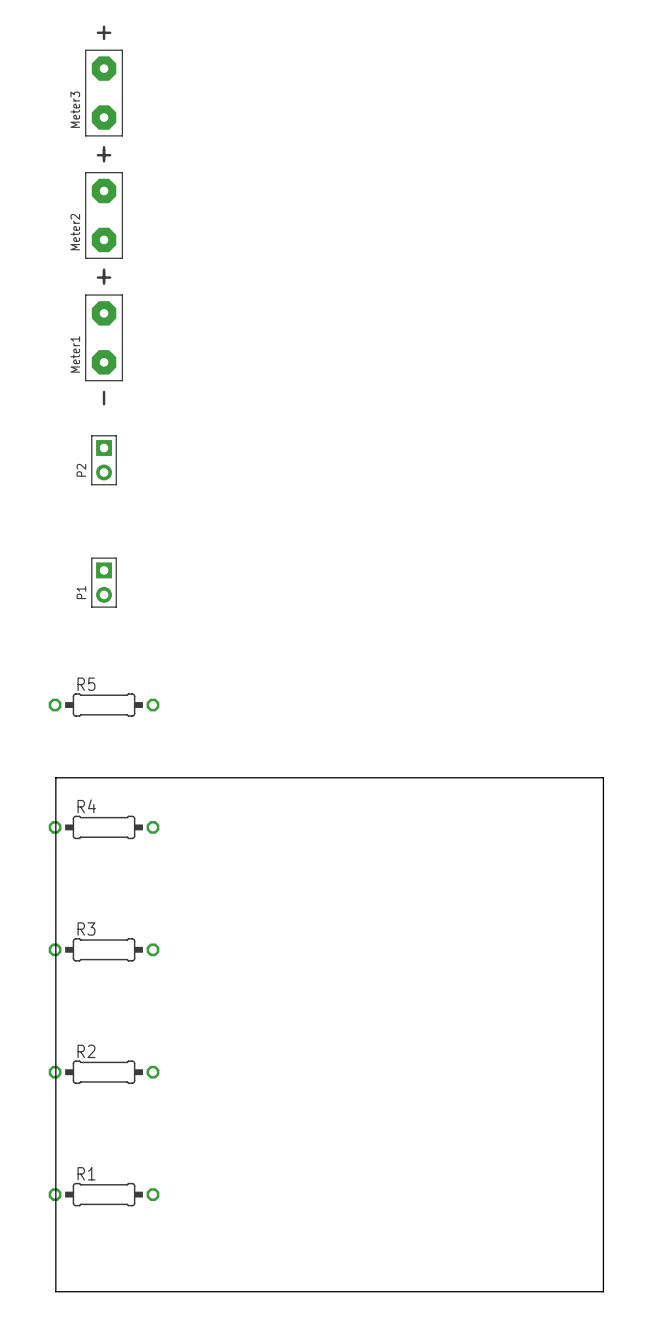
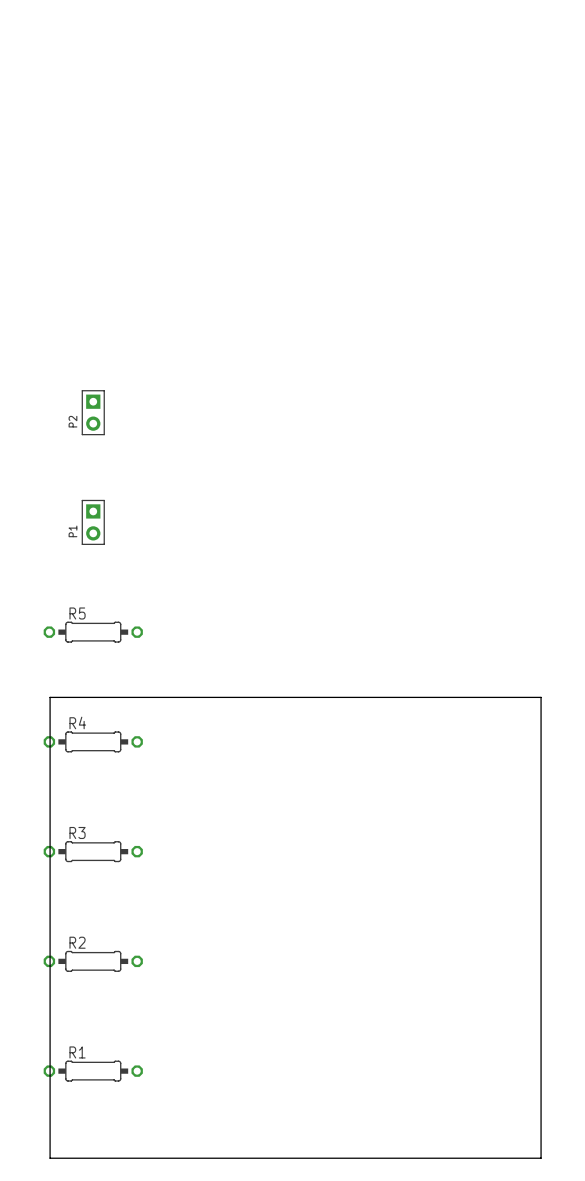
Meter3: (104, 93) -> none
Meter2: (104, 215) -> none
Meter1: (104, 337) -> none

